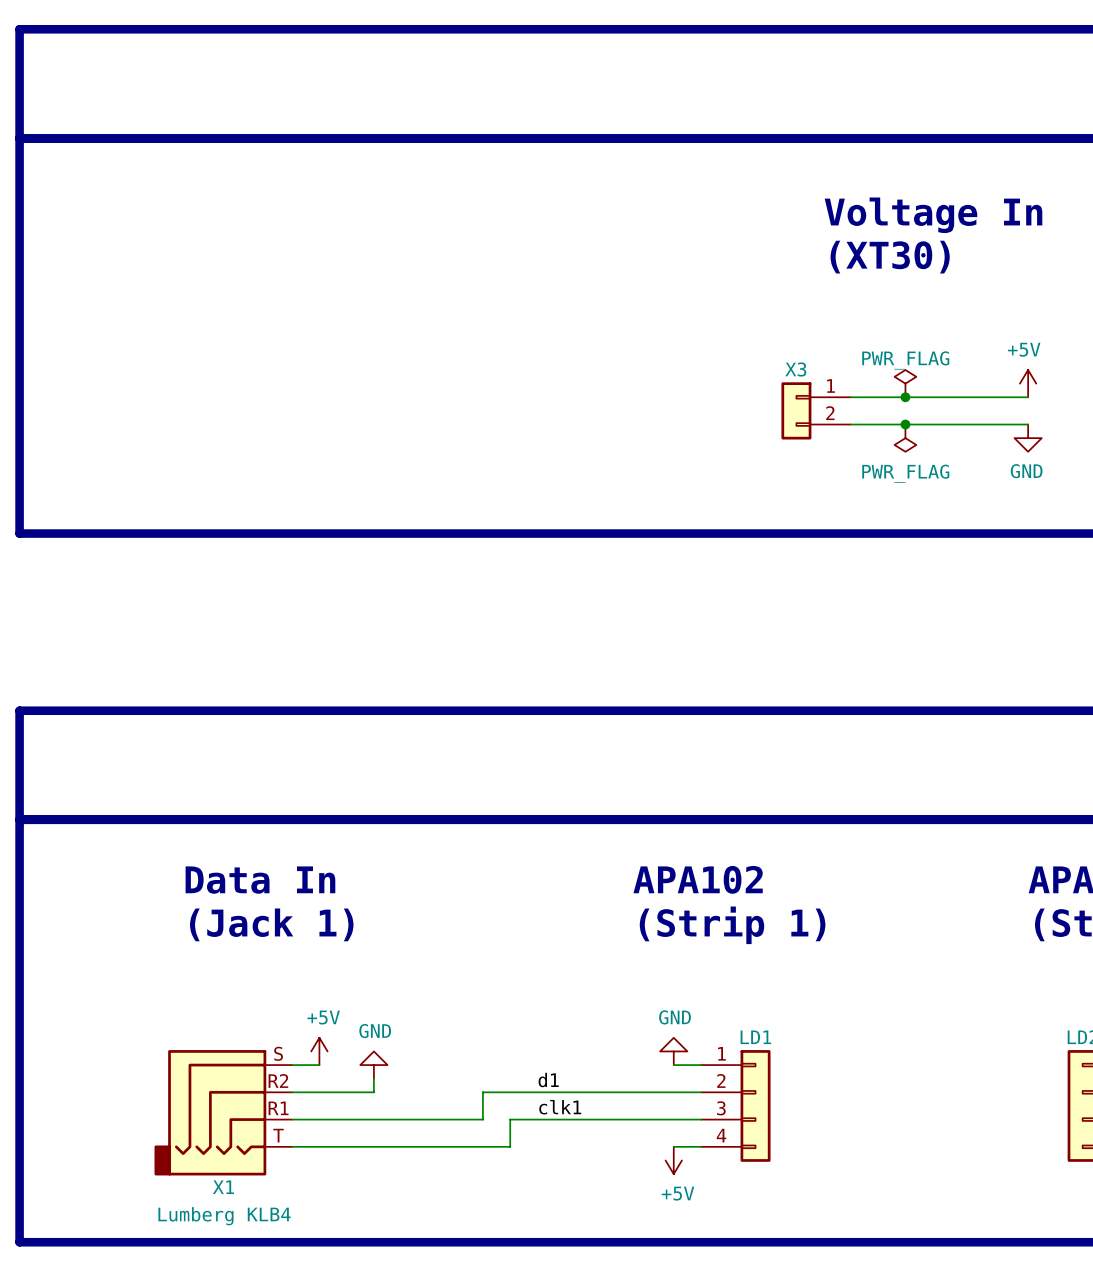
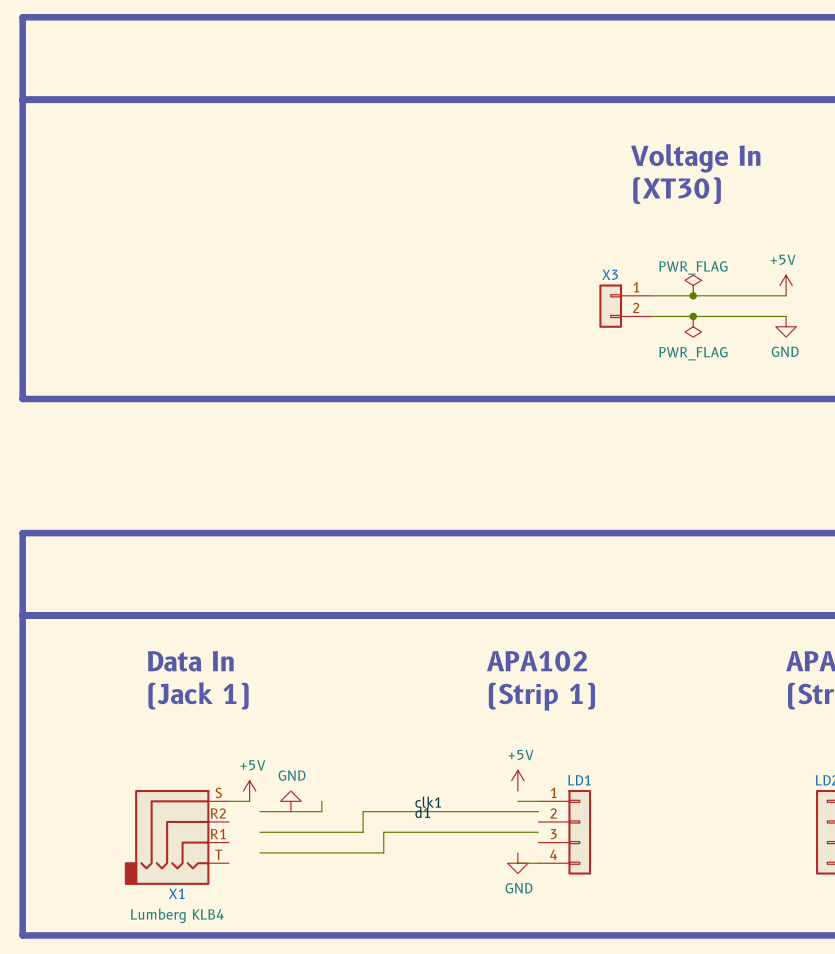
power symbol rotation: 0° (673, 1051) -> 180° (517, 863)
power symbol position: GND (673, 1051) -> GND (517, 863)
wire: (373, 1078) (373, 1092) (292, 1092) -> (321, 801) (321, 811) (259, 811)
wire: none -> (538, 811) (363, 811) (363, 832) (259, 832)
wire: (701, 1092) (482, 1092) (482, 1119) (292, 1119) -> none
wire: none -> (538, 832) (383, 832) (383, 852) (259, 852)
label position: clk1 (560, 1107) -> clk1 (428, 802)
wire: (701, 1119) (510, 1119) (510, 1146) (292, 1146) -> none
power symbol rotation: 0° (673, 1160) -> 180° (517, 780)
power symbol position: +5V (673, 1160) -> +5V (517, 780)

